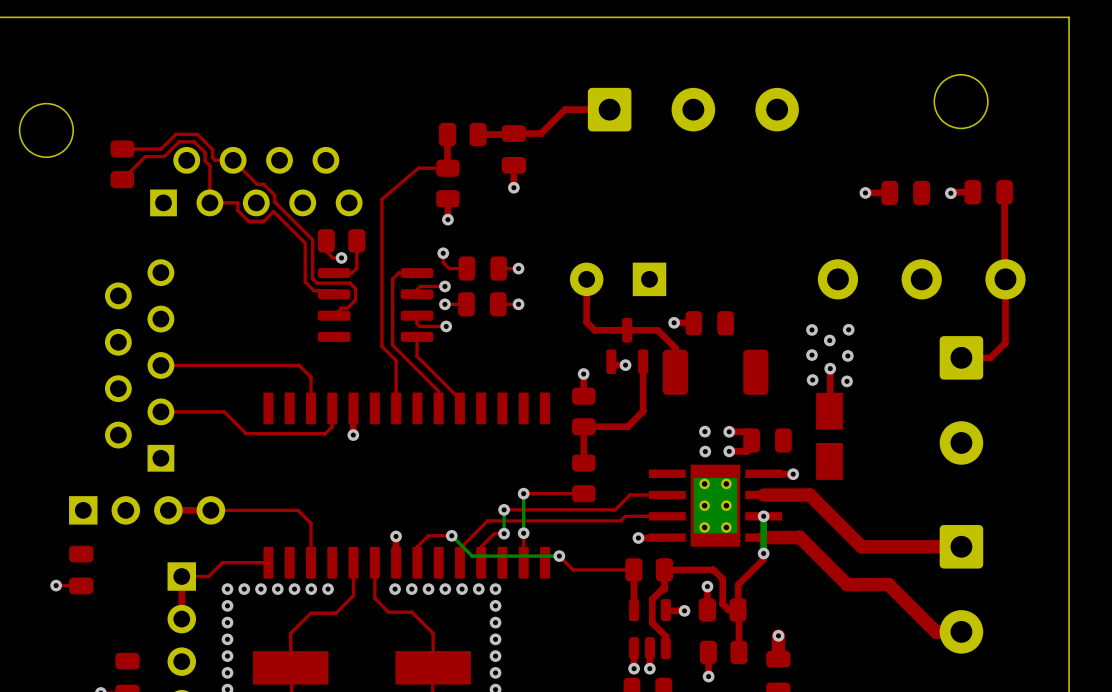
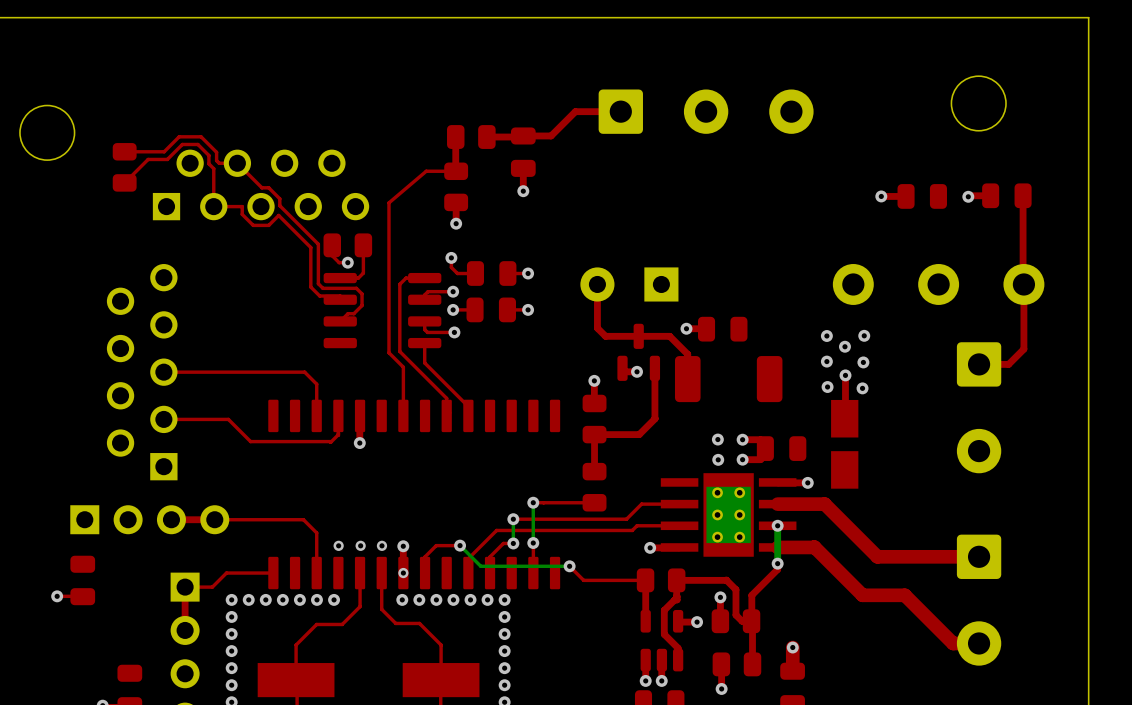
via: none -> (338, 545)
via: none -> (360, 545)
via: none -> (381, 545)
via: none -> (403, 573)

